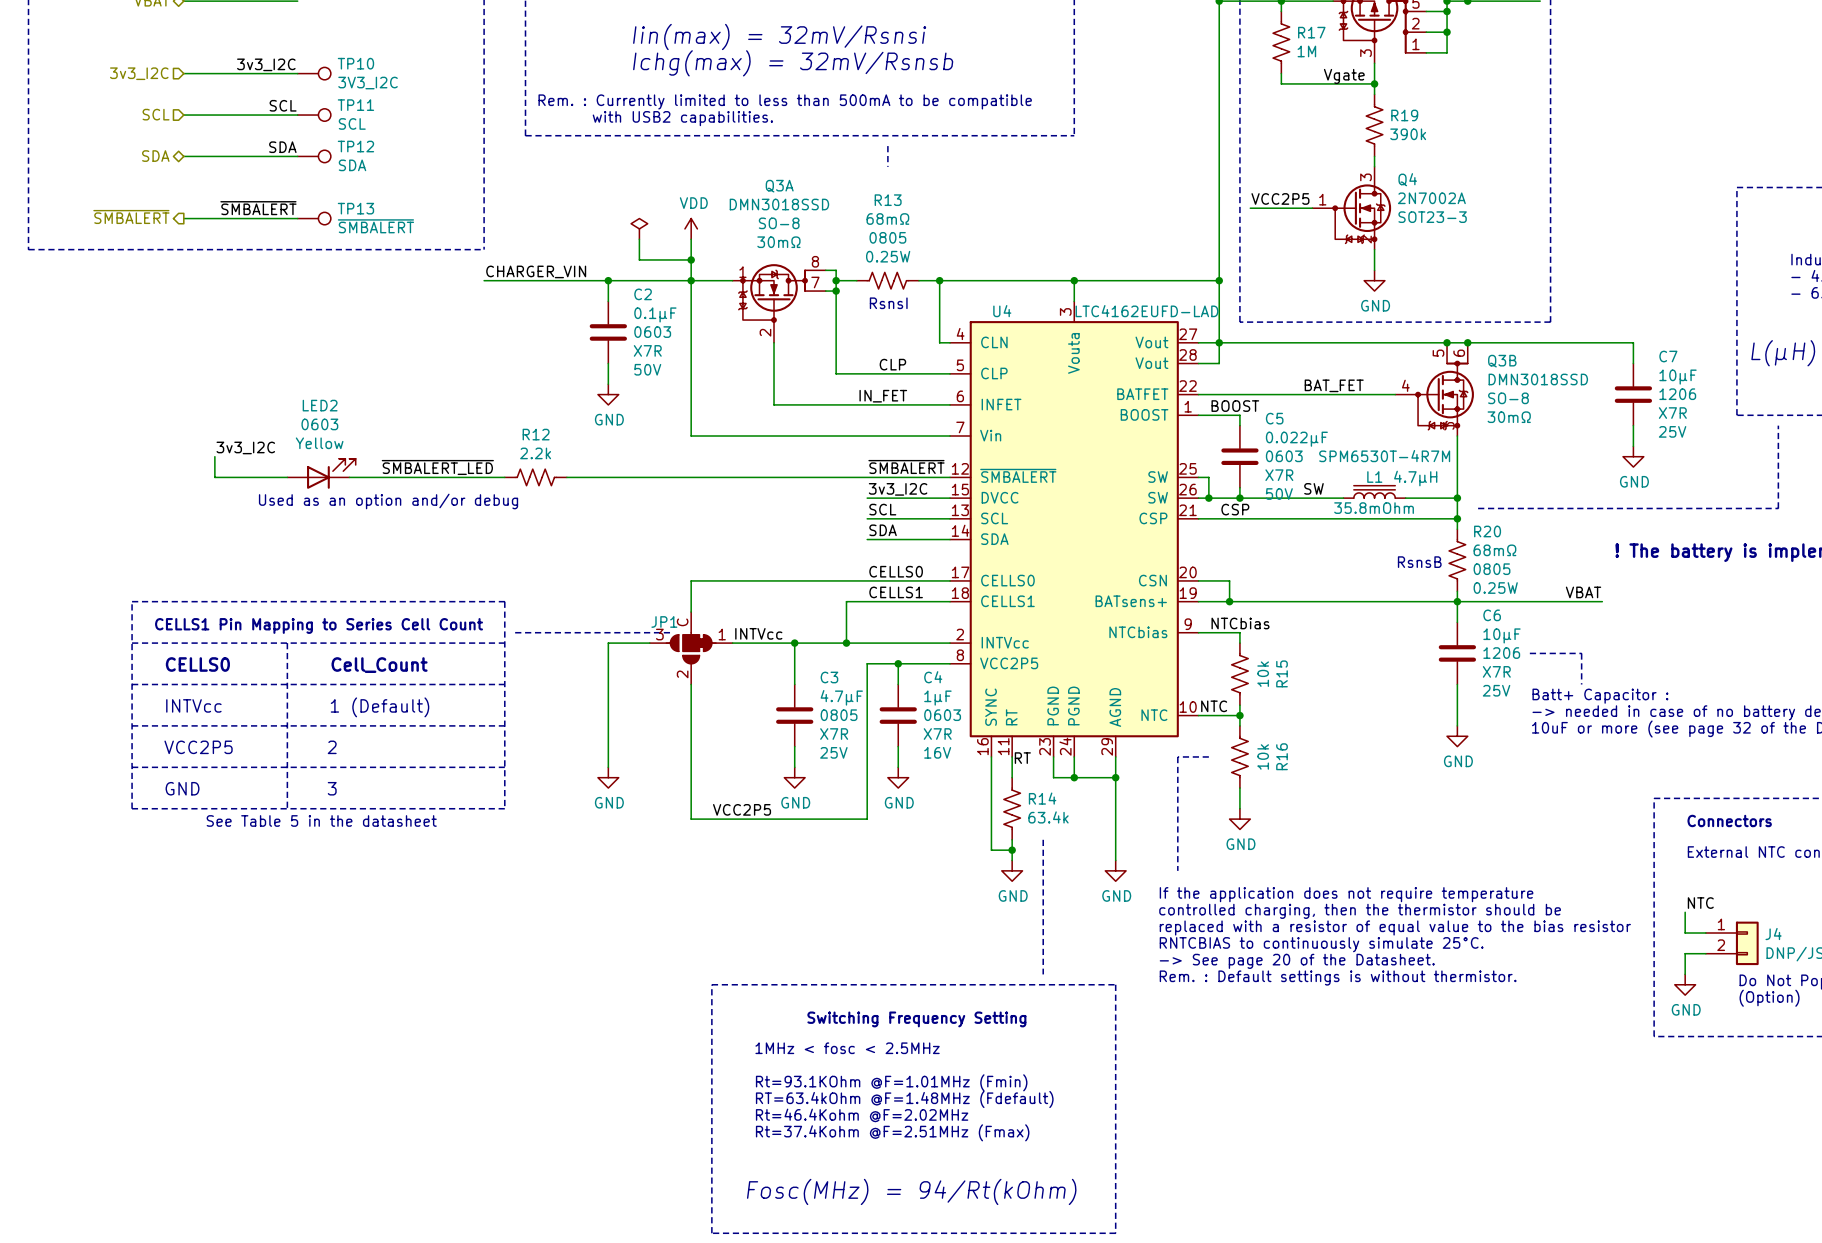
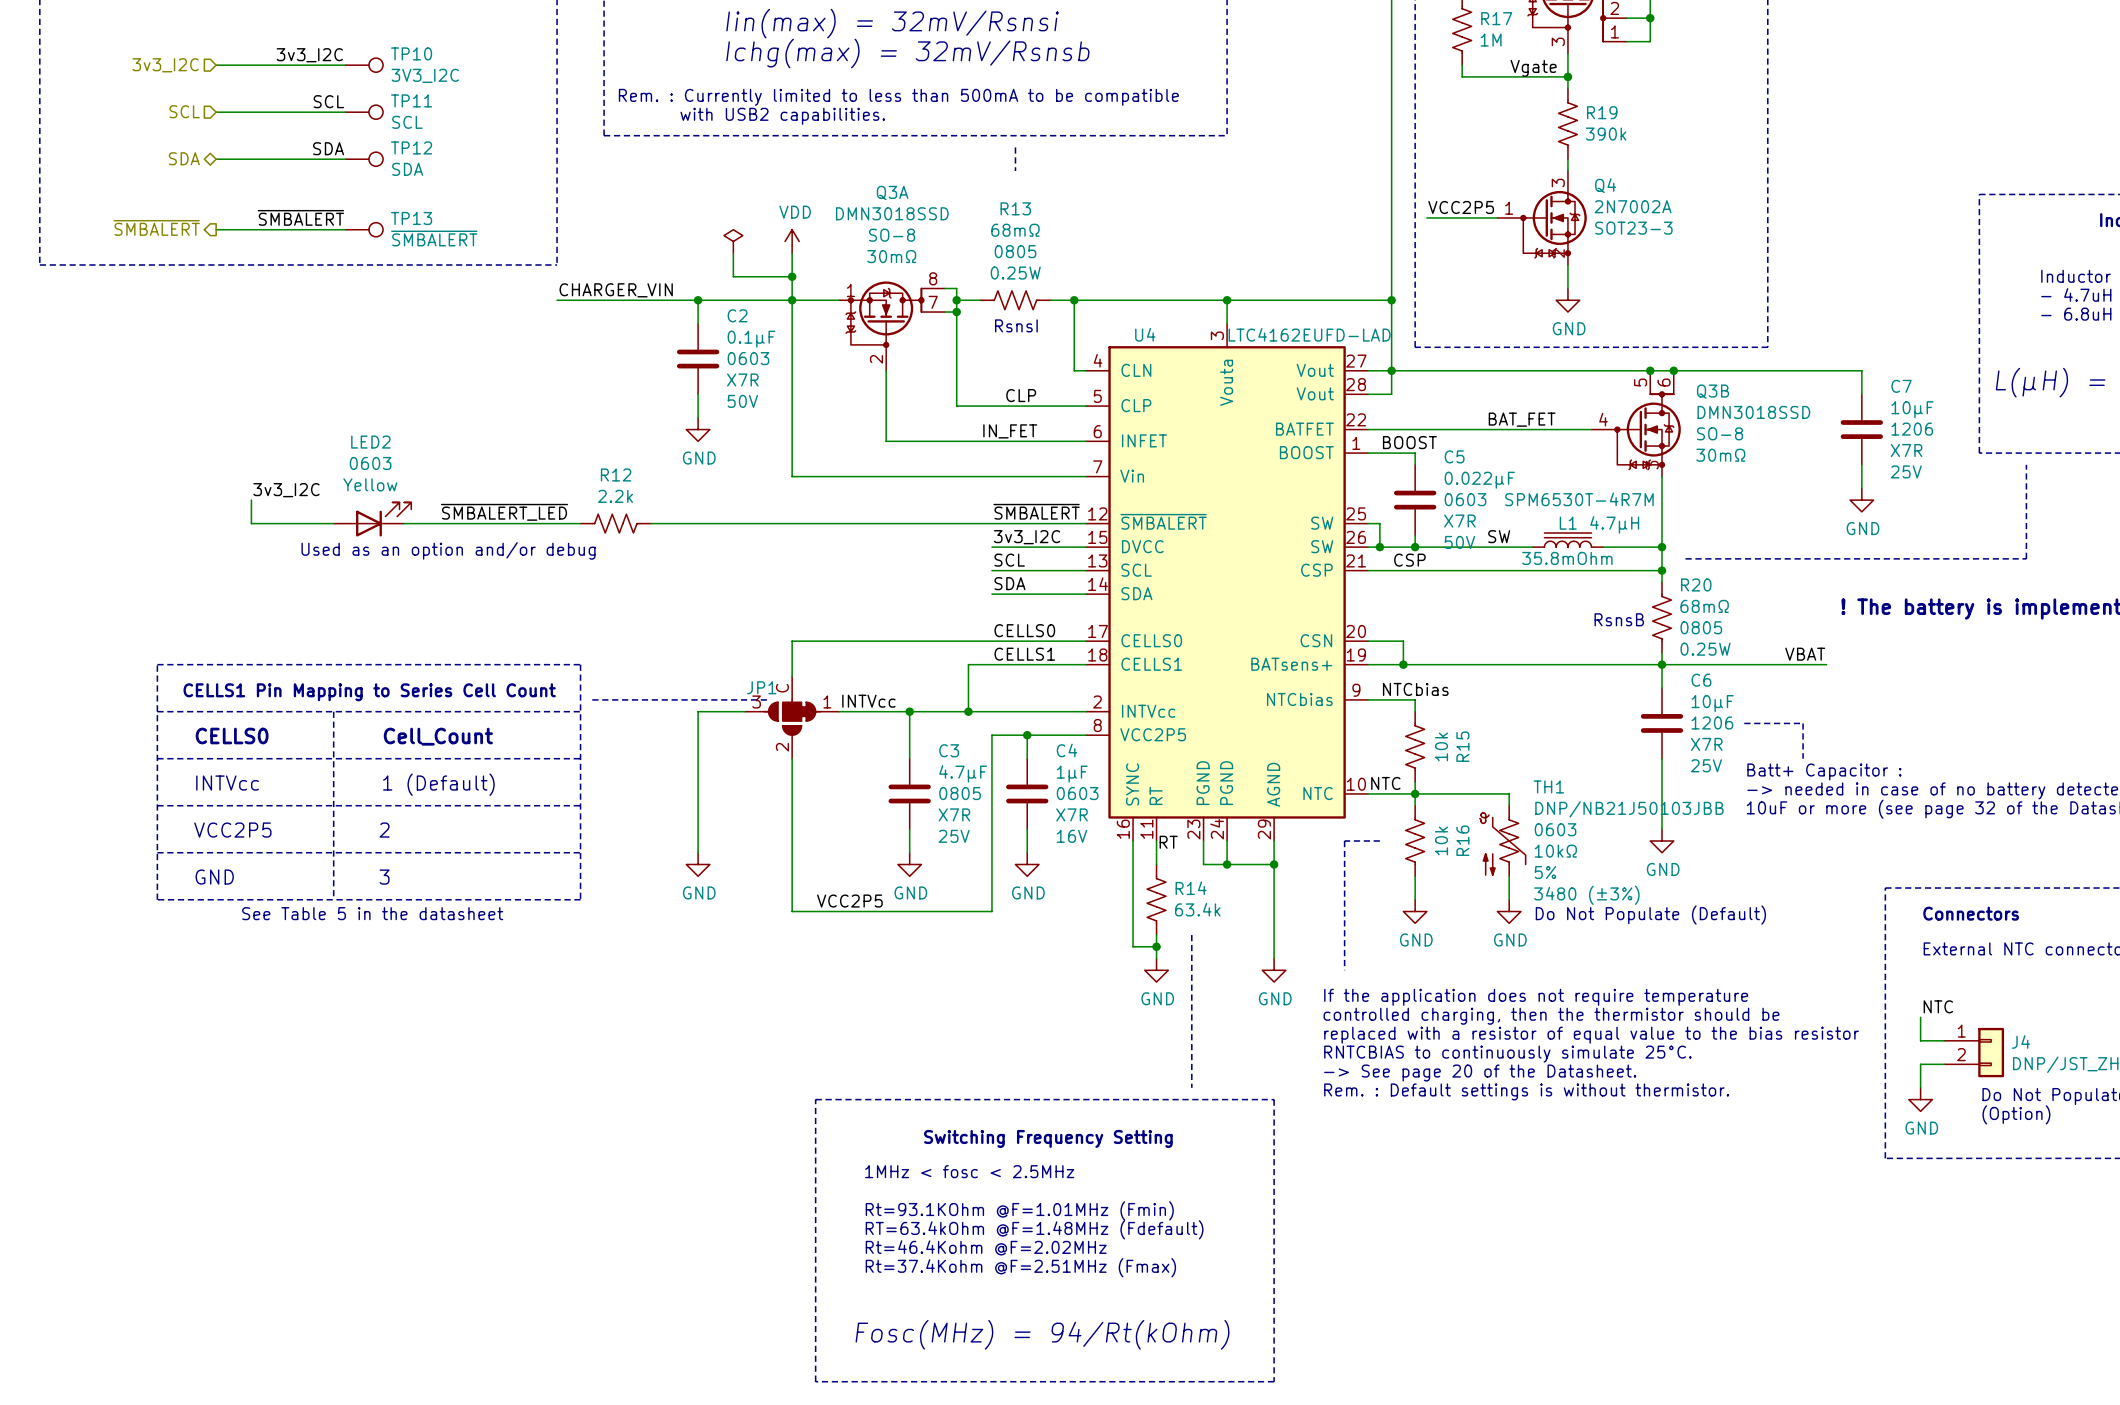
wire: none -> (1415, 793) (1509, 793) (1509, 805)
power symbol position: GND (1457, 736) -> GND (1662, 840)
TH1: none -> DNP/NB21J50103JBB (1502, 840)
wire: none -> (1509, 876) (1509, 899)
power symbol: none -> GND (1509, 911)
text: none -> Do Not Populate (Default) (1650, 915)

